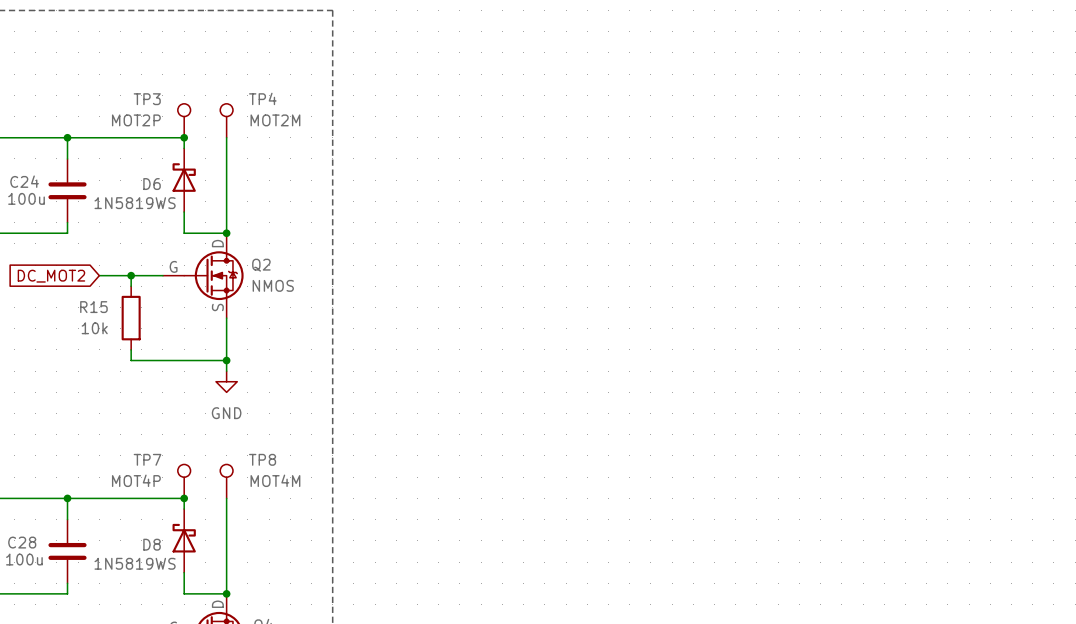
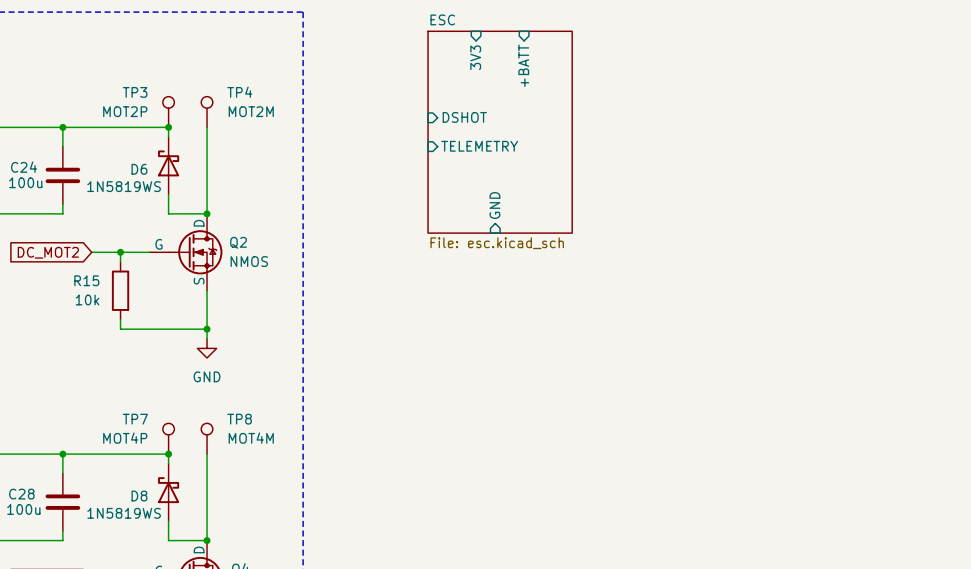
sheet pin: none -> 3V3 (475, 57)
sheet pin: none -> +BATT (523, 65)
sheet pin: none -> DSHOT (464, 117)
sheet ESC: none -> File: esc.kicad_sch (500, 132)
sheet pin: none -> TELEMETRY (479, 146)
sheet pin: none -> GND (494, 205)

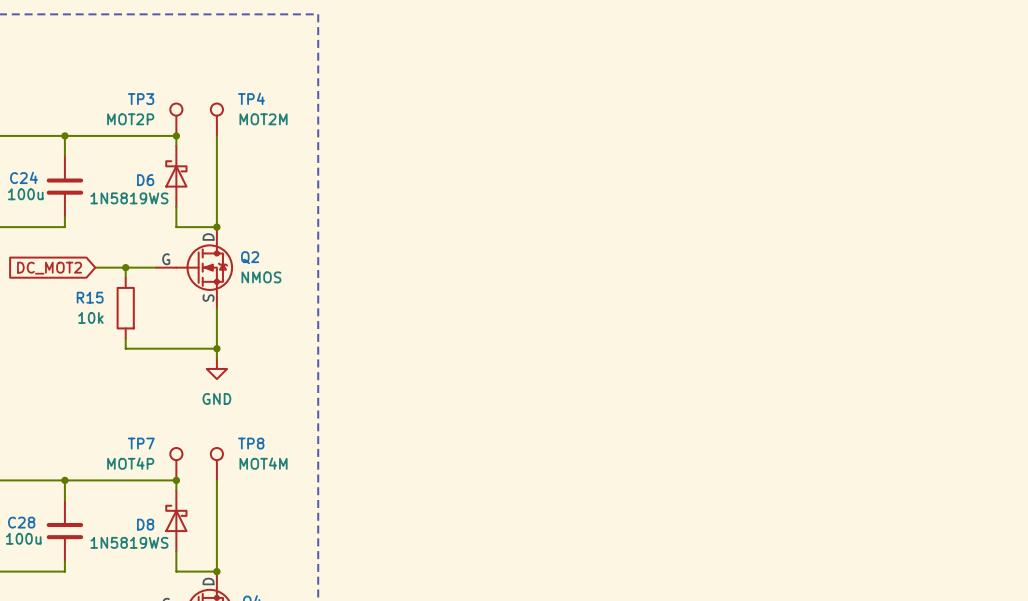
sheet pin: 3V3 (475, 57) -> none
sheet pin: +BATT (523, 65) -> none
sheet pin: DSHOT (464, 117) -> none
sheet ESC: File: esc.kicad_sch (500, 132) -> none
sheet pin: TELEMETRY (479, 146) -> none
sheet pin: GND (494, 205) -> none

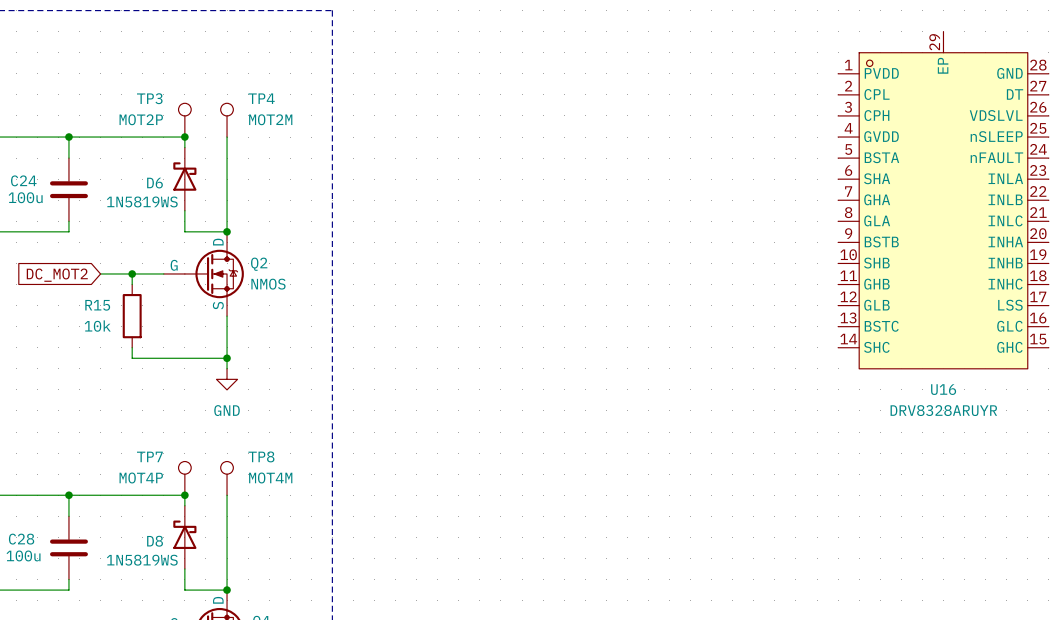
U16: none -> DRV8328ARUYR (943, 200)

